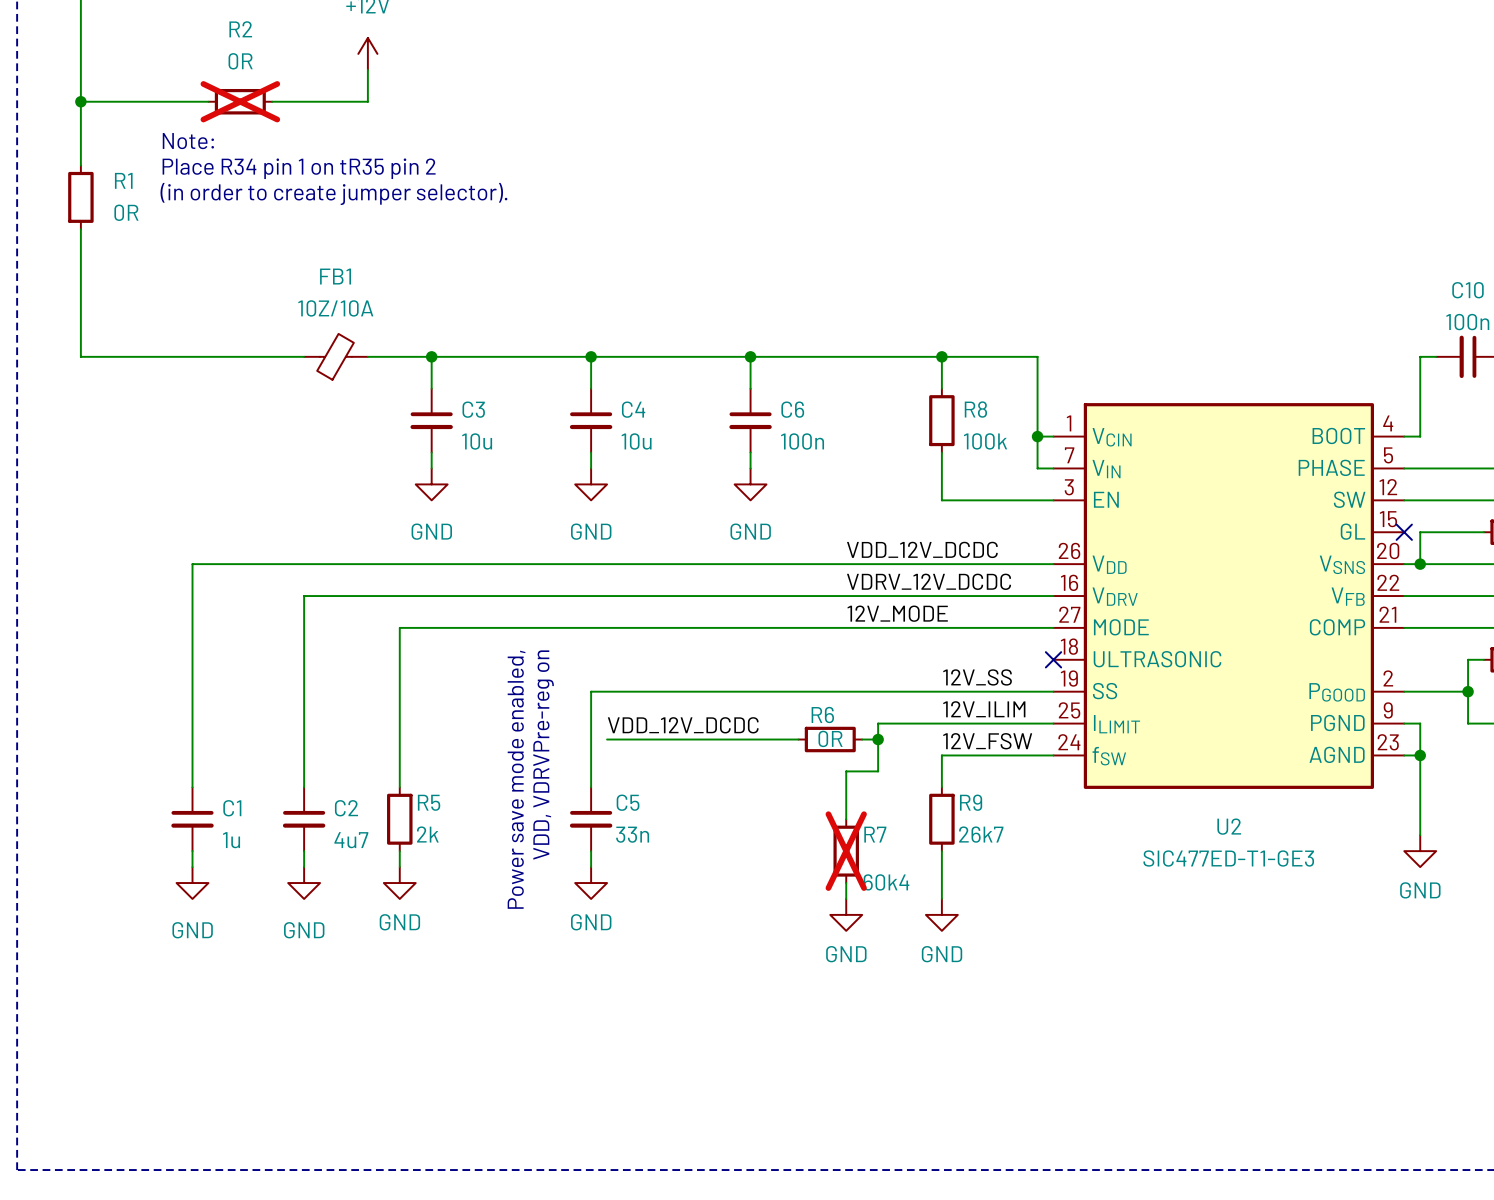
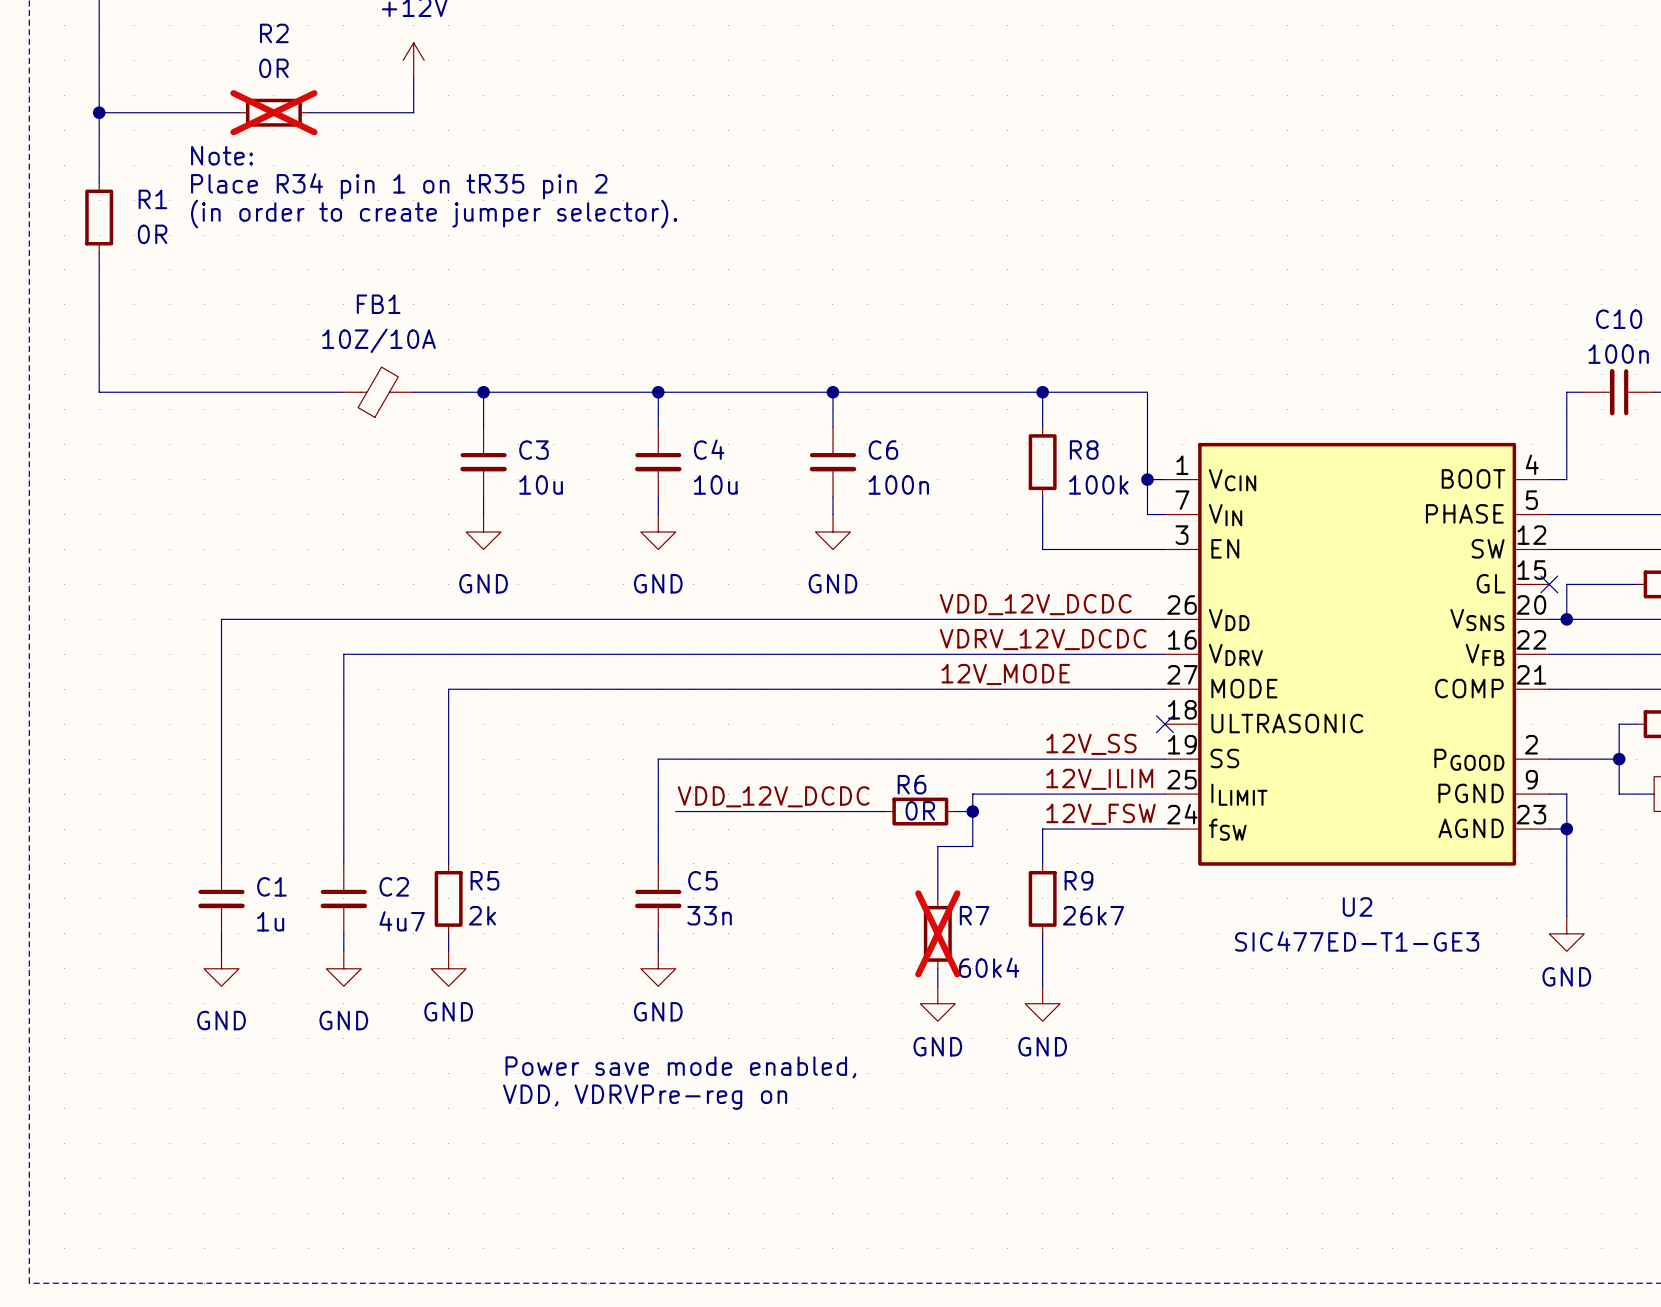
text: VDD, VDRVPre-reg on (543, 755) -> none
text: Power save mode enabled, (516, 779) -> none
text: none -> Power save mode enabled, (680, 1067)
text: none -> VDD, VDRVPre-reg on (645, 1097)

